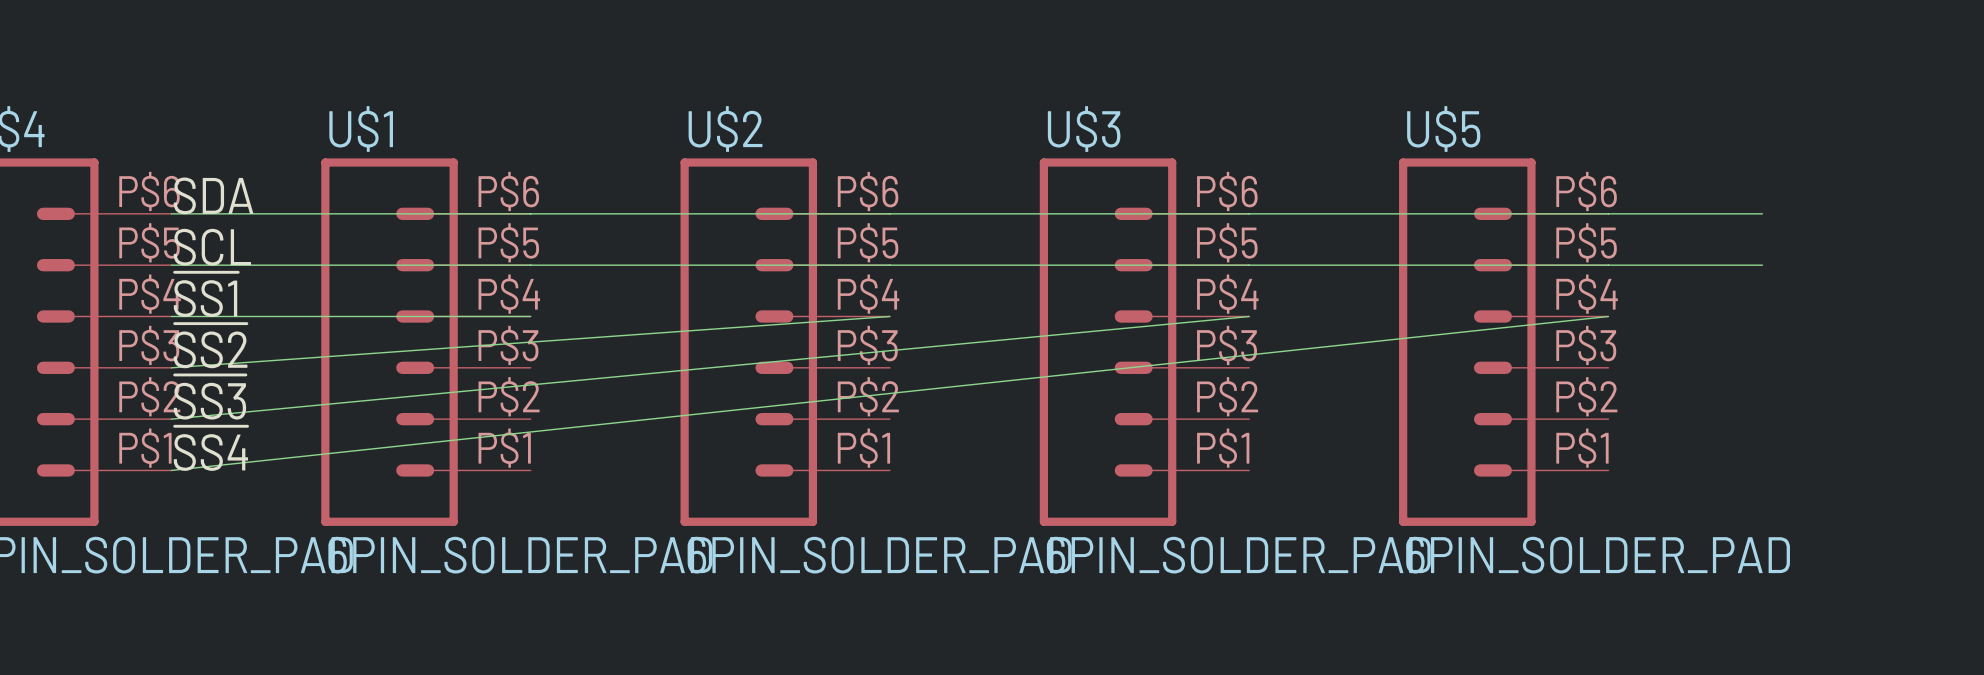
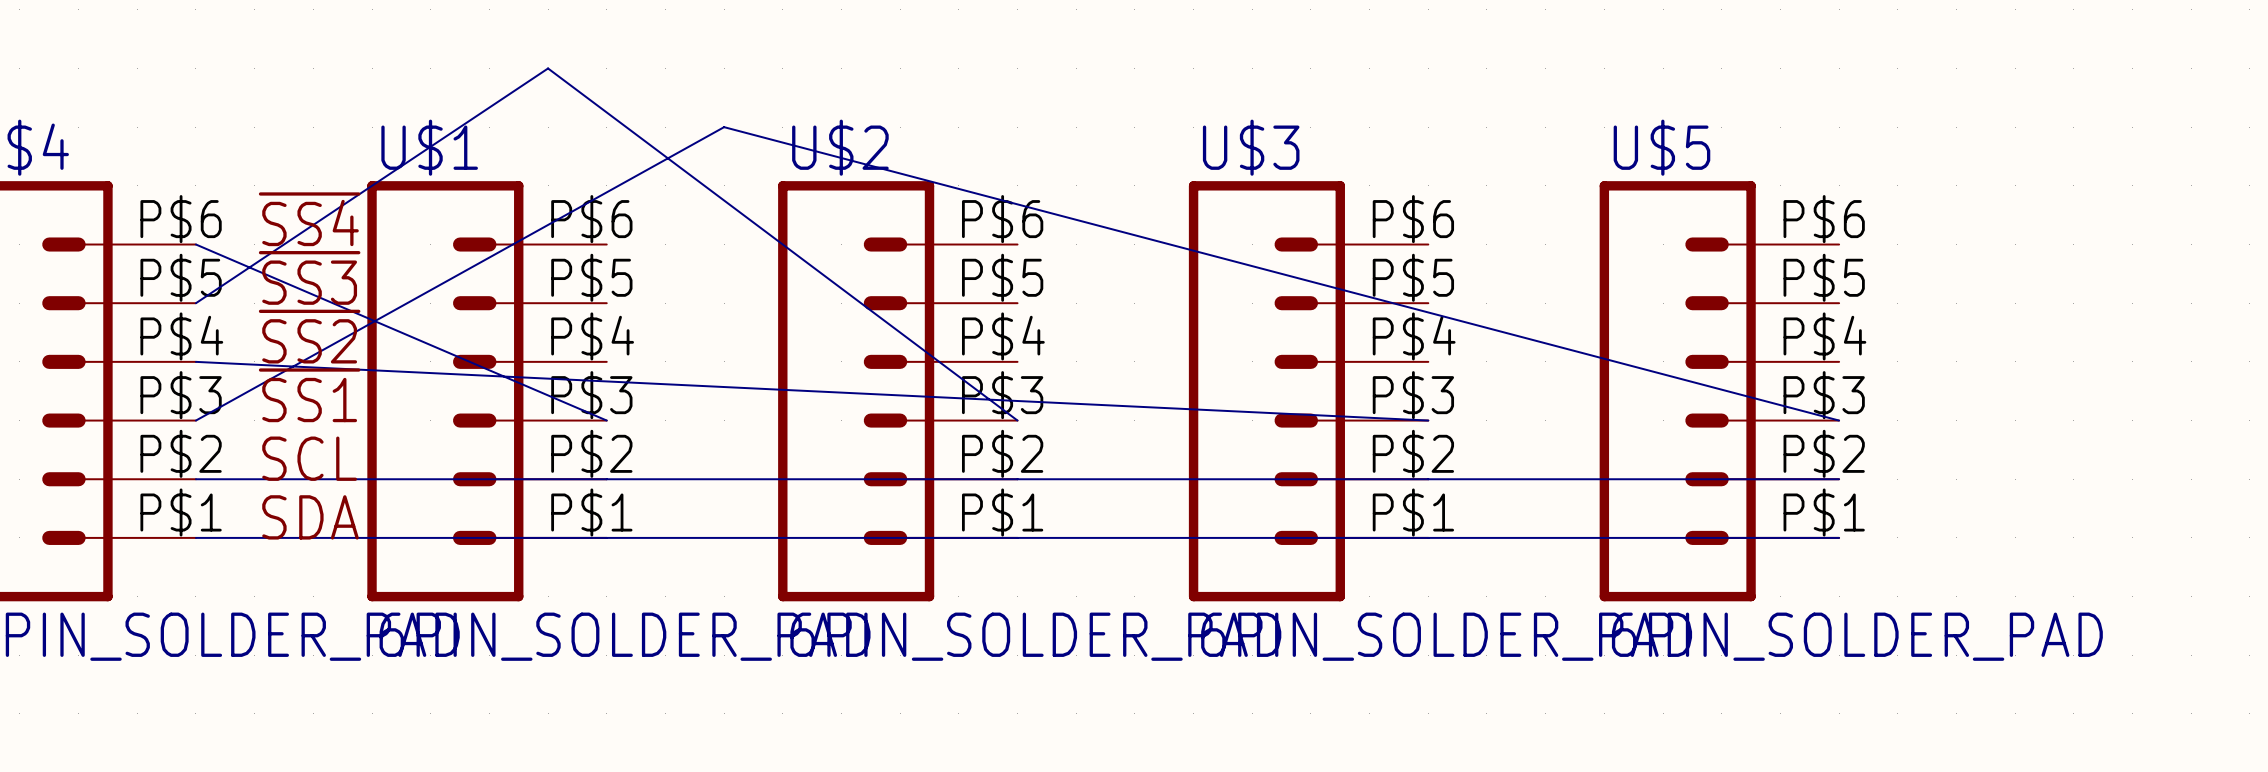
label position: SDA (213, 195) -> SDA (310, 517)
wire: (171, 213) (1762, 213) -> (195, 244) (606, 420)
label position: SCL (212, 247) -> SCL (309, 458)
wire: (171, 265) (1762, 265) -> (195, 303) (548, 68) (1017, 420)
label position: ~{SS1} (206, 294) -> ~{SS1} (309, 395)
wire: (171, 316) (530, 316) -> (195, 361) (1428, 420)
wire: (889, 316) (171, 367) -> (1839, 420) (724, 127) (195, 420)
wire: (1249, 316) (171, 419) -> (1839, 479) (195, 479)
wire: (1608, 316) (171, 470) -> (1839, 537) (195, 537)
label position: ~{SS2} (210, 345) -> ~{SS2} (309, 336)
label position: ~{SS3} (209, 397) -> ~{SS3} (309, 277)
label position: ~{SS4} (210, 448) -> ~{SS4} (309, 219)

